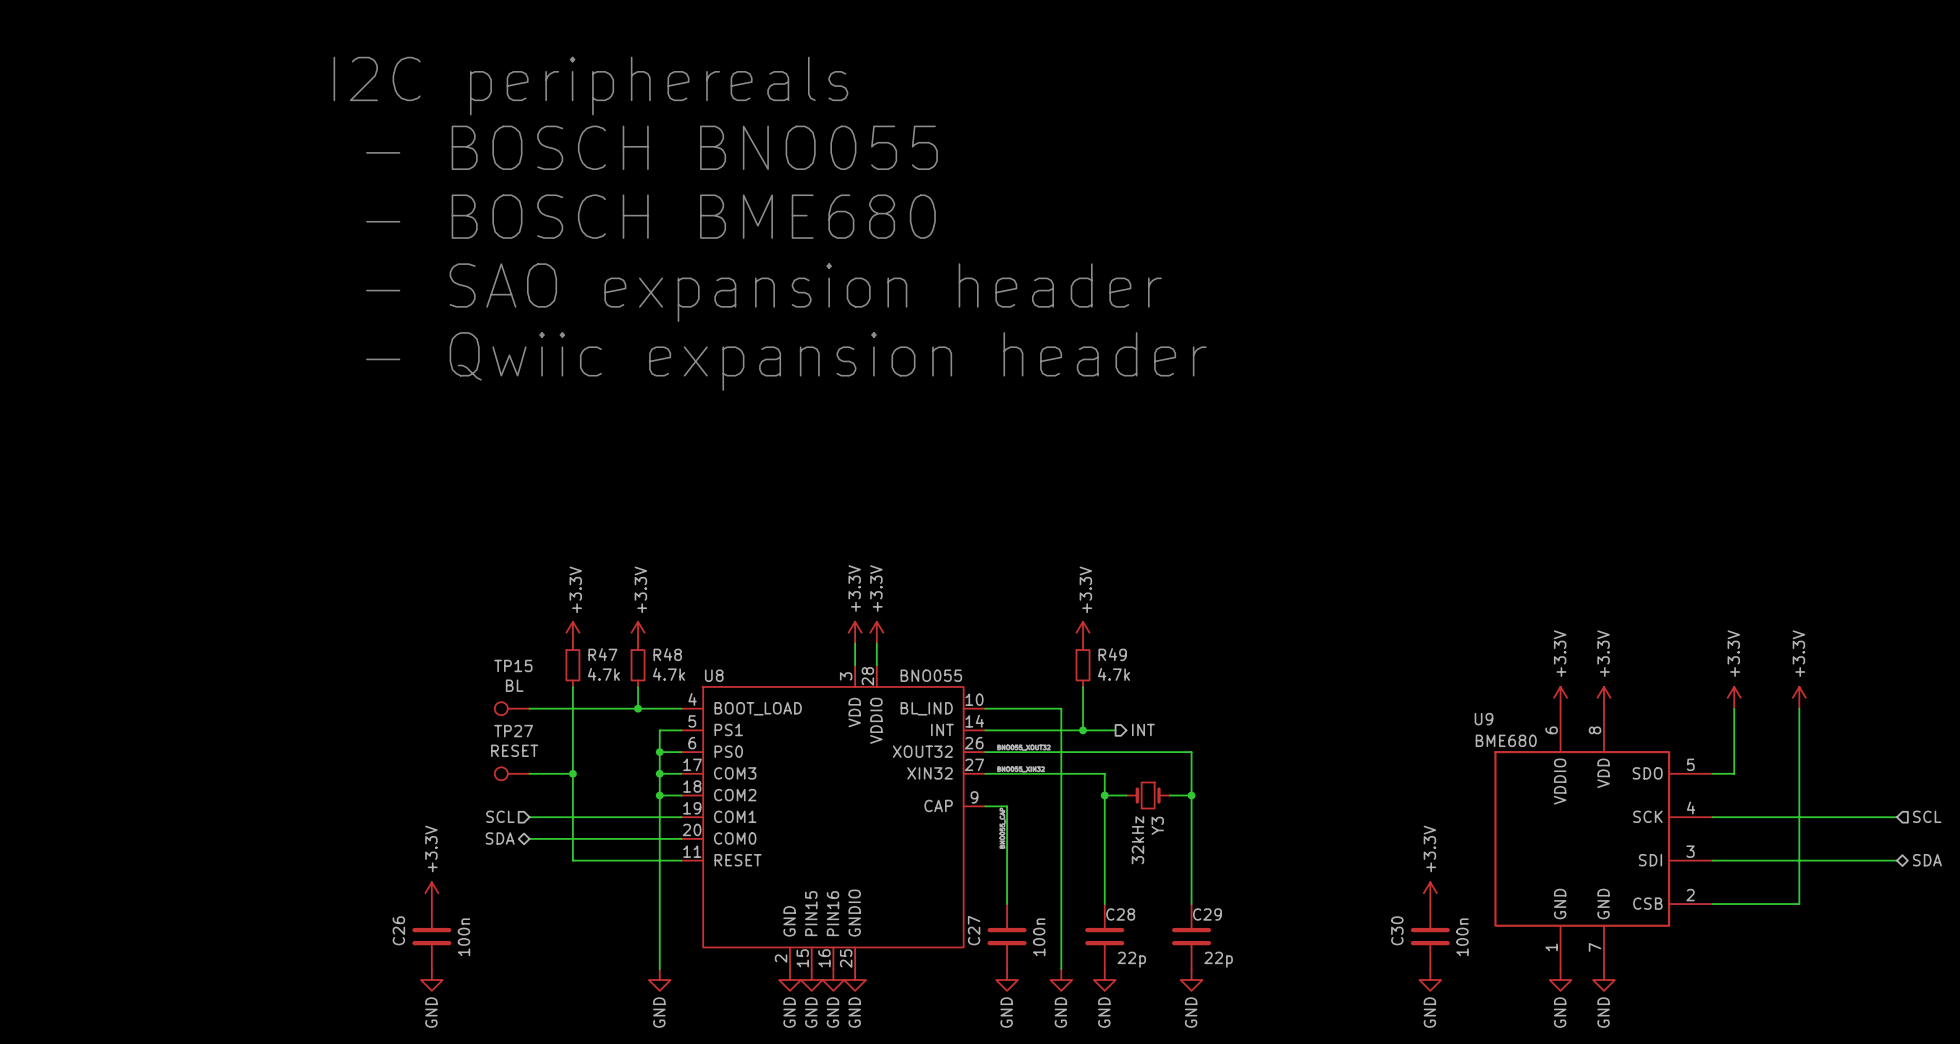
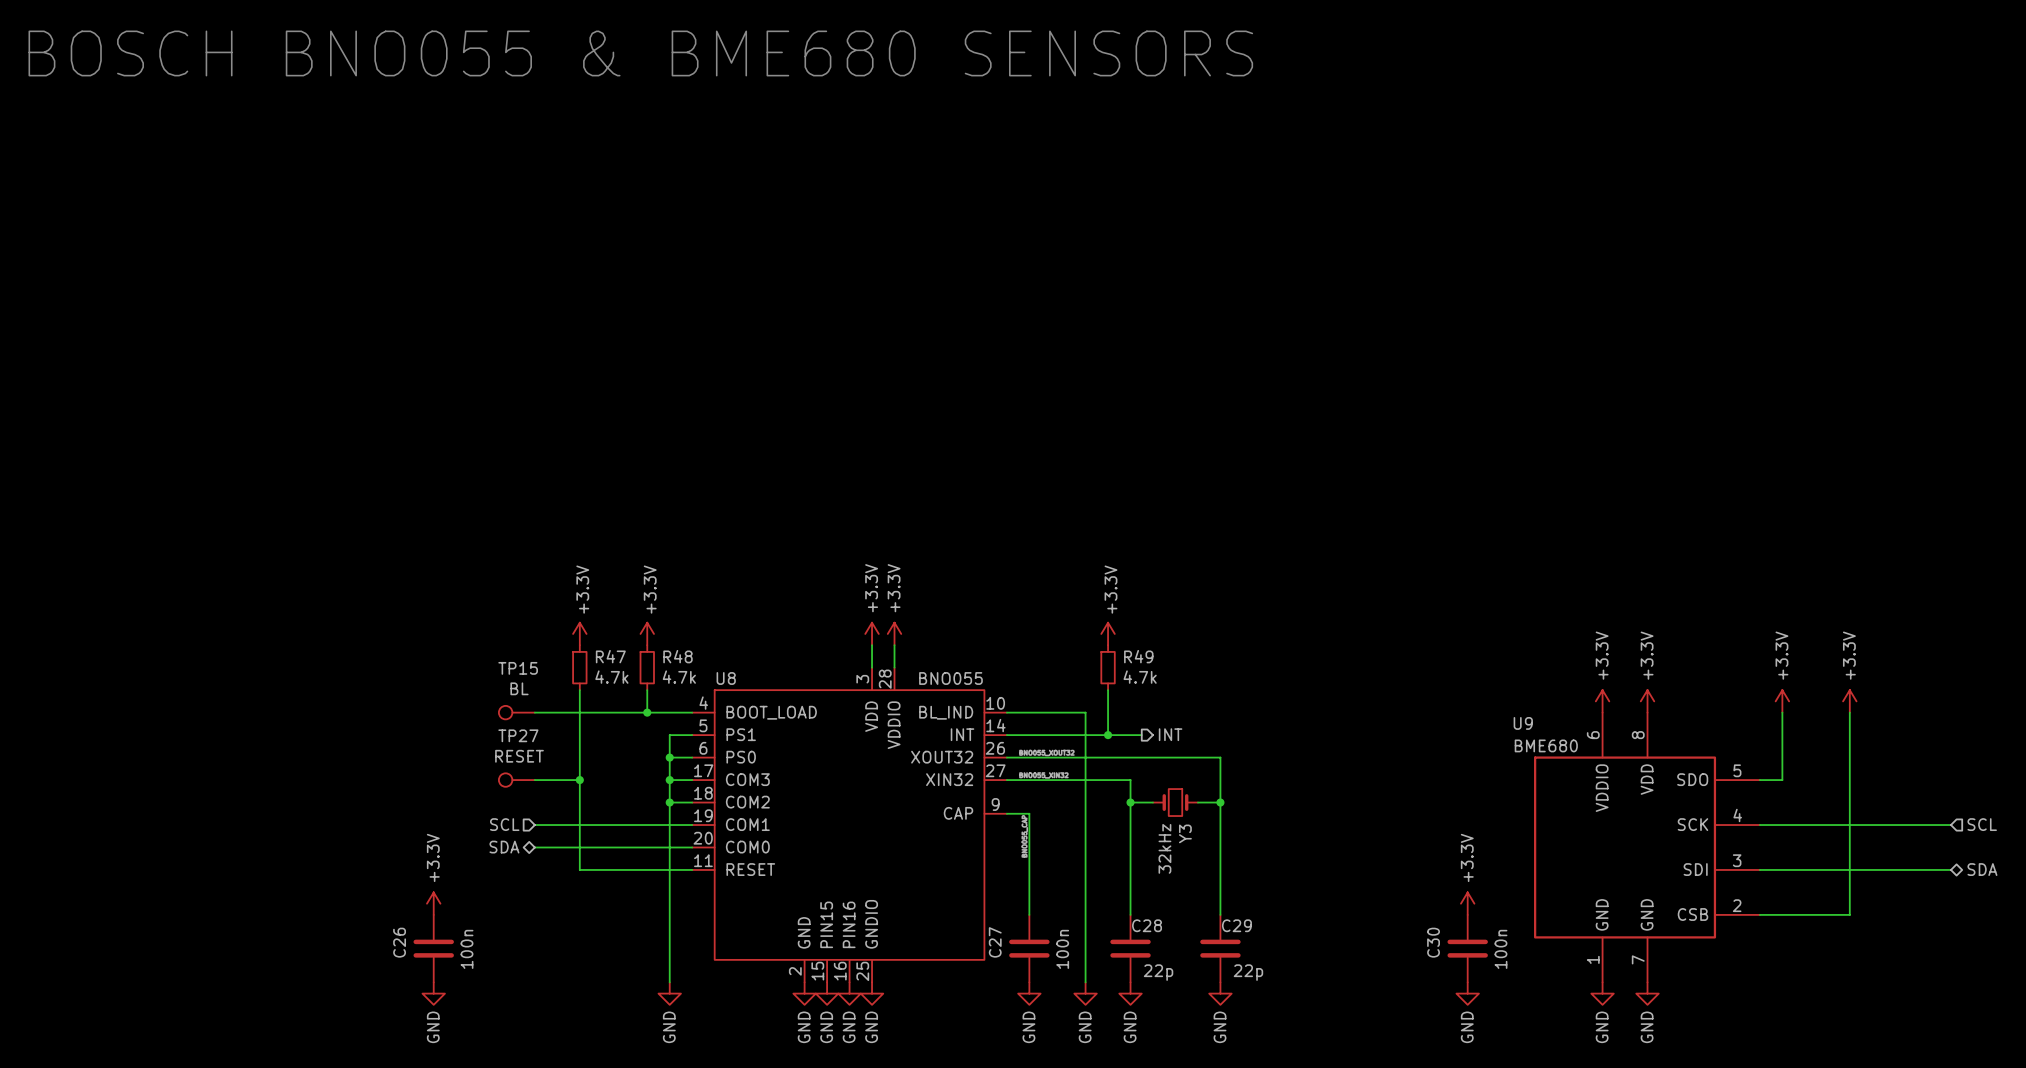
text: none -> BOSCH BNO055 & BME680 SENSORS (640, 53)
text: I2C periphereals (590, 86) -> none
text: - BOSCH BNO055 (652, 147) -> none
text: - BOSCH BME680 (650, 216) -> none
text: - SAO expansion header (763, 292) -> none
text: - Qwiic expansion header (786, 361) -> none

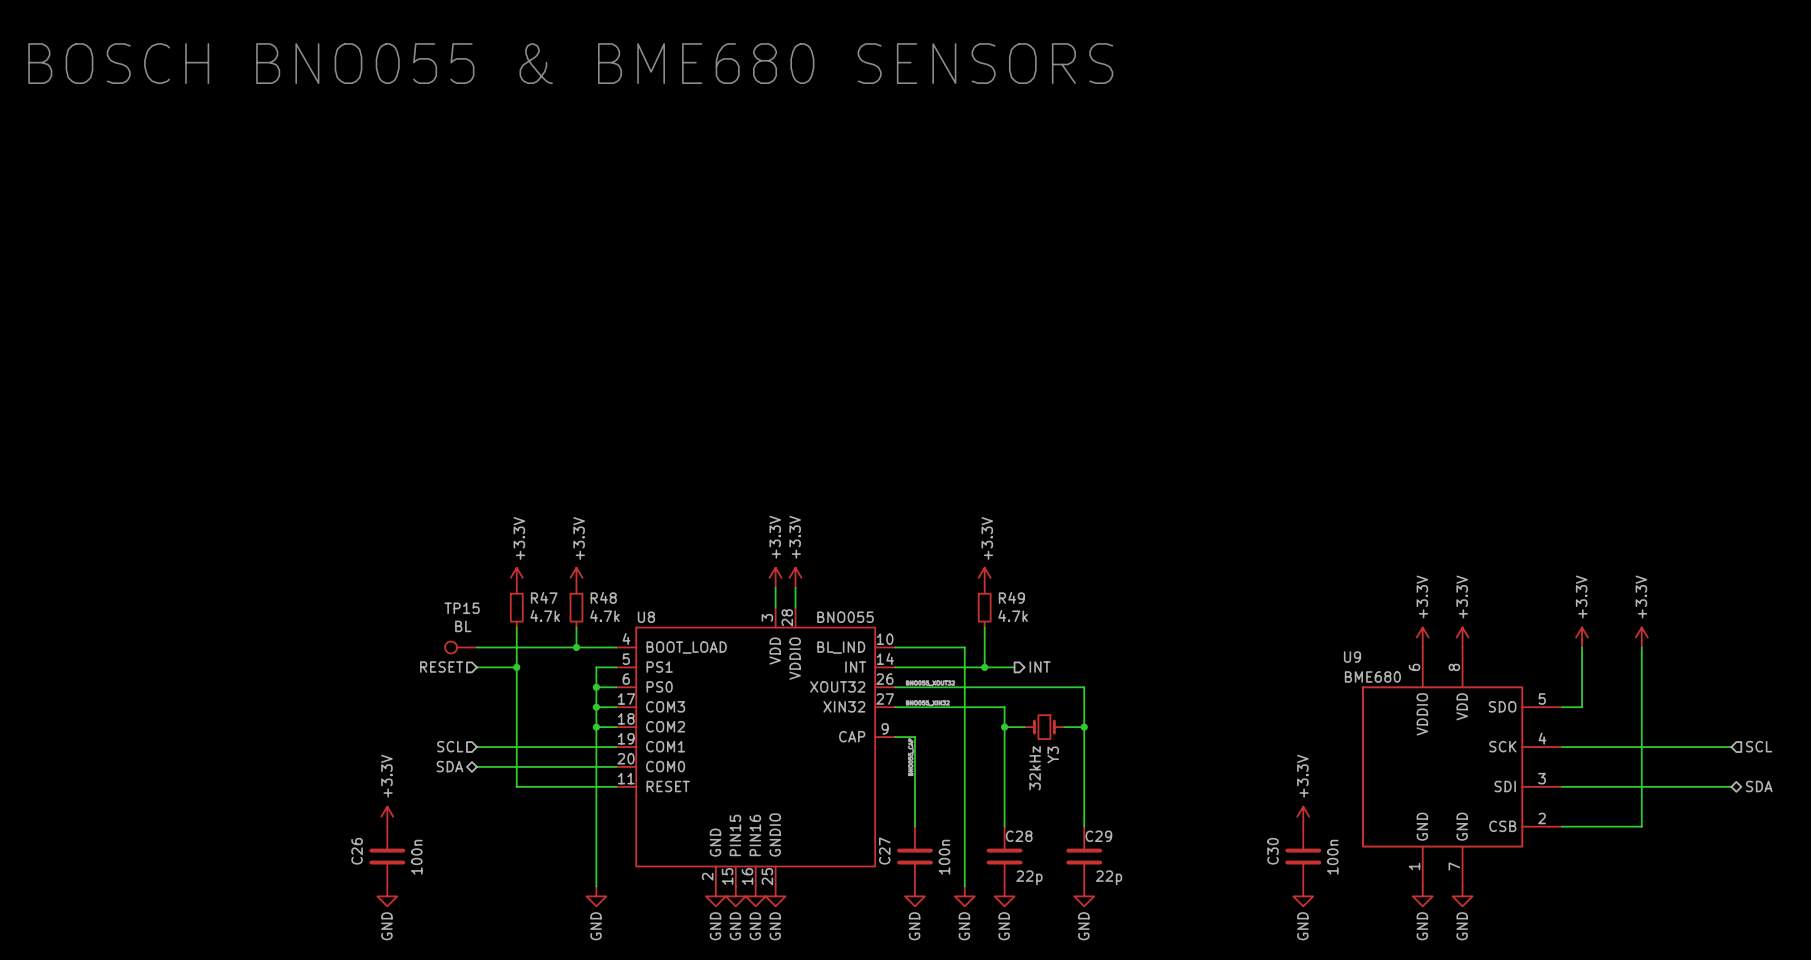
hierarchical label: none -> RESET (441, 667)
TP27: RESET (516, 780) -> none
wire: (534, 780) (579, 780) -> (476, 667) (516, 667)
junction position: (579, 780) -> (516, 667)

